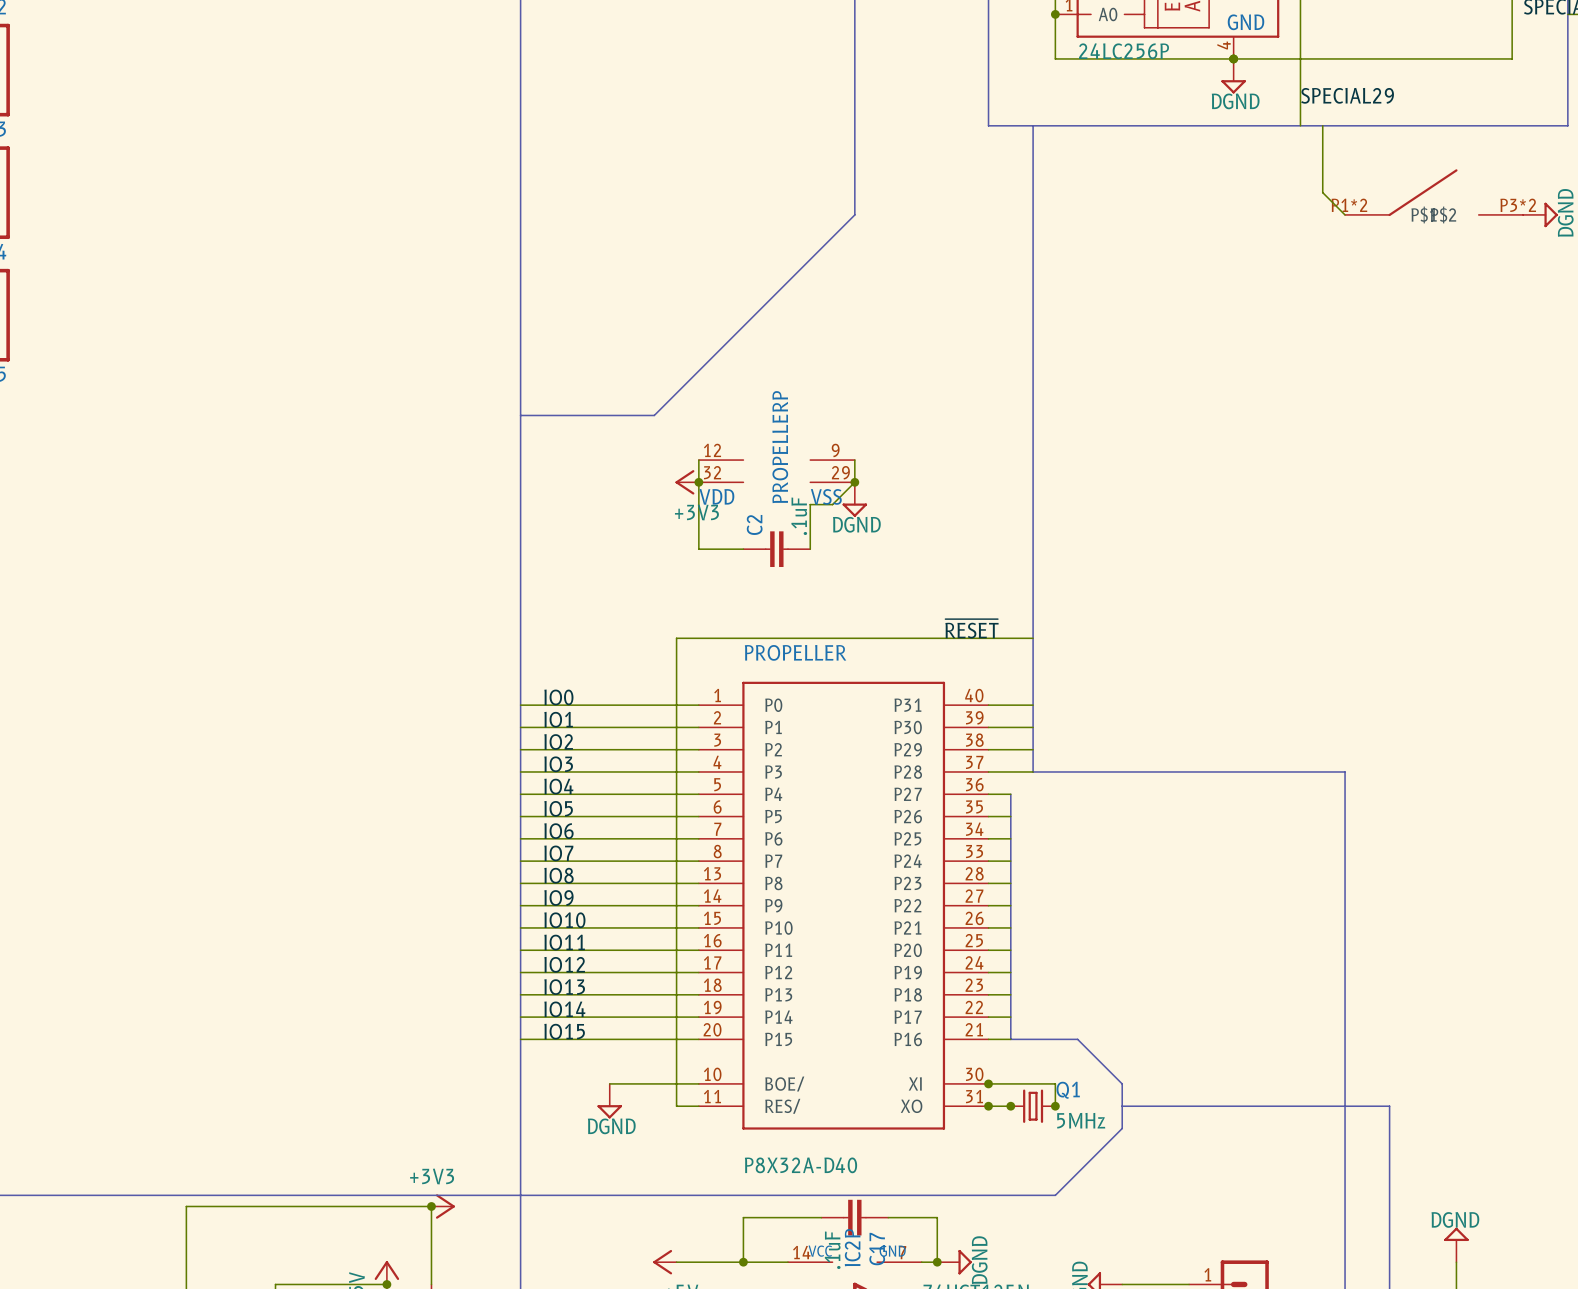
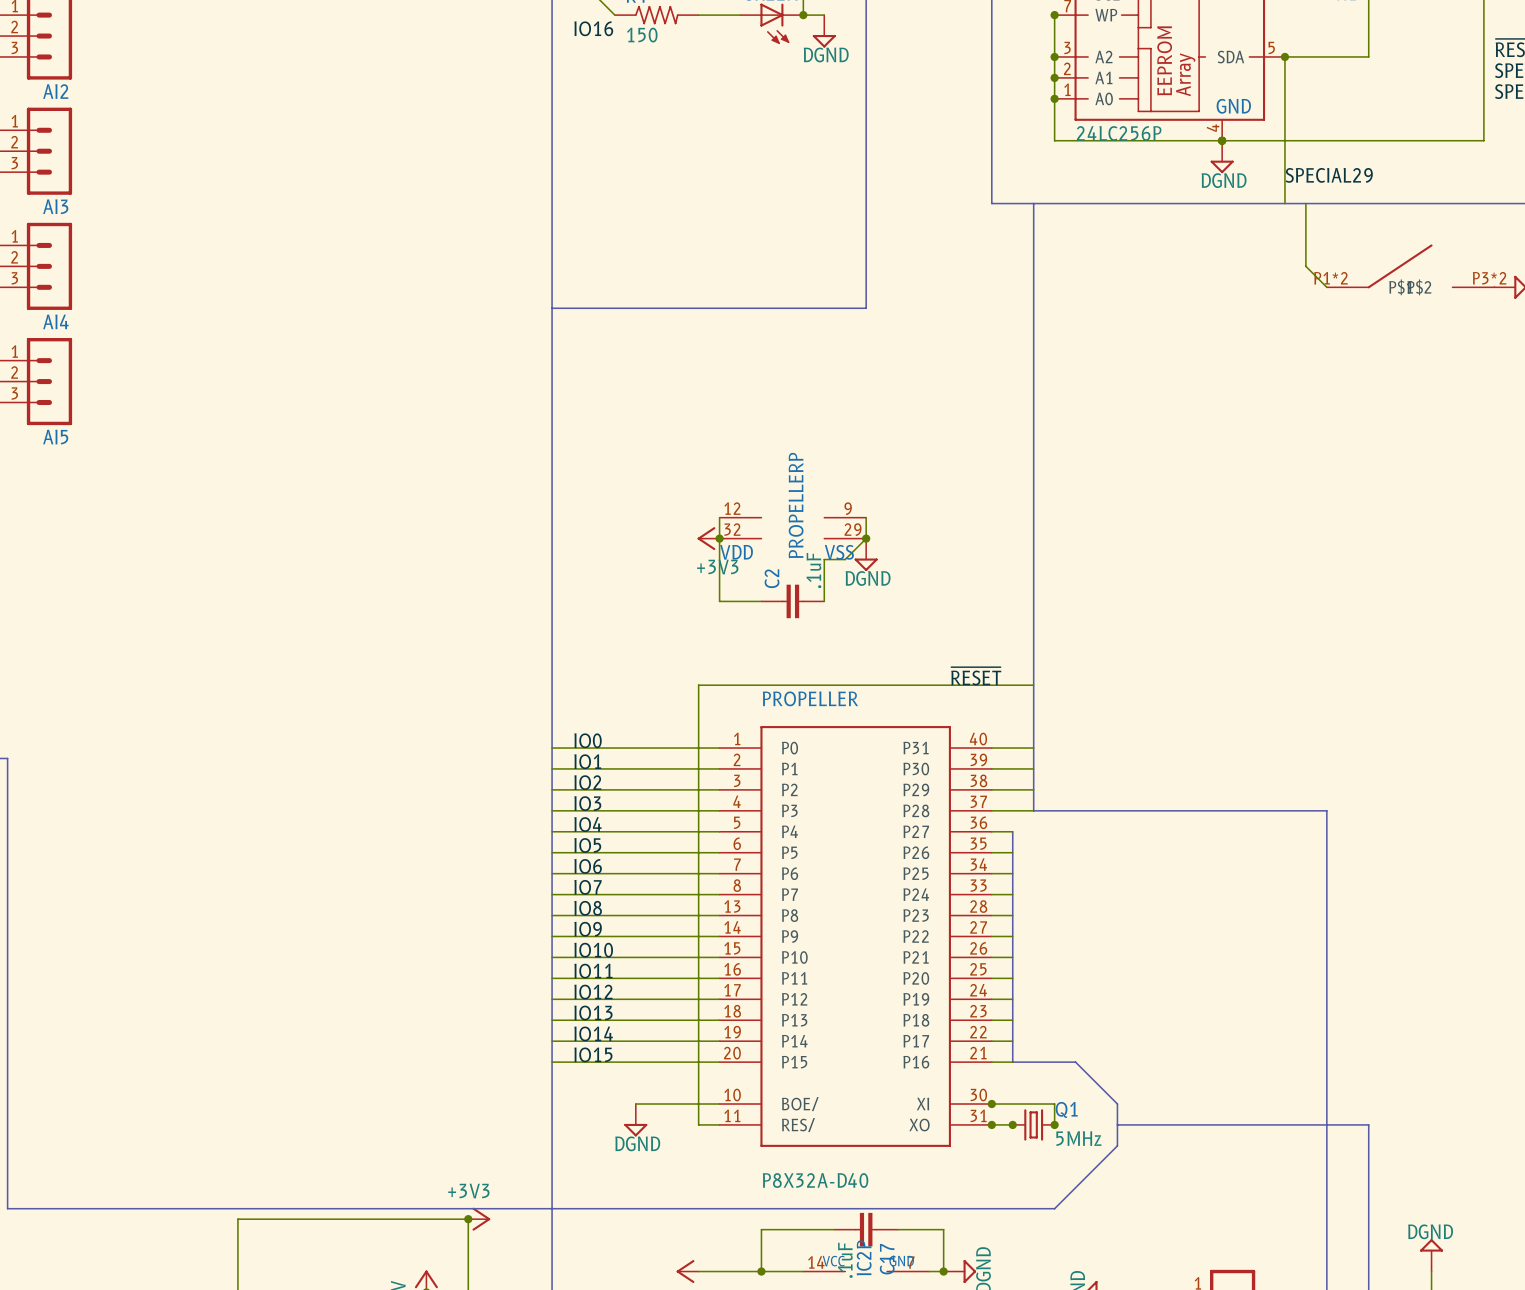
bus: (854, 214) (654, 415) (520, 415) -> (866, 287) (866, 308) (552, 308)

